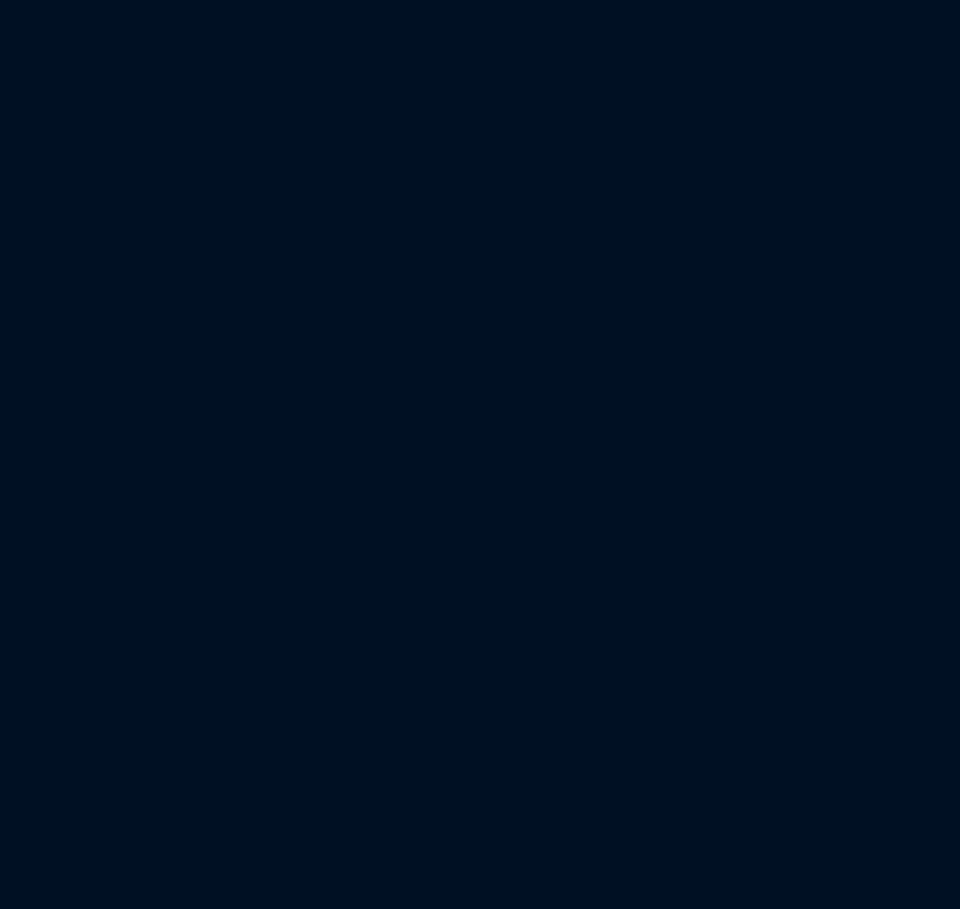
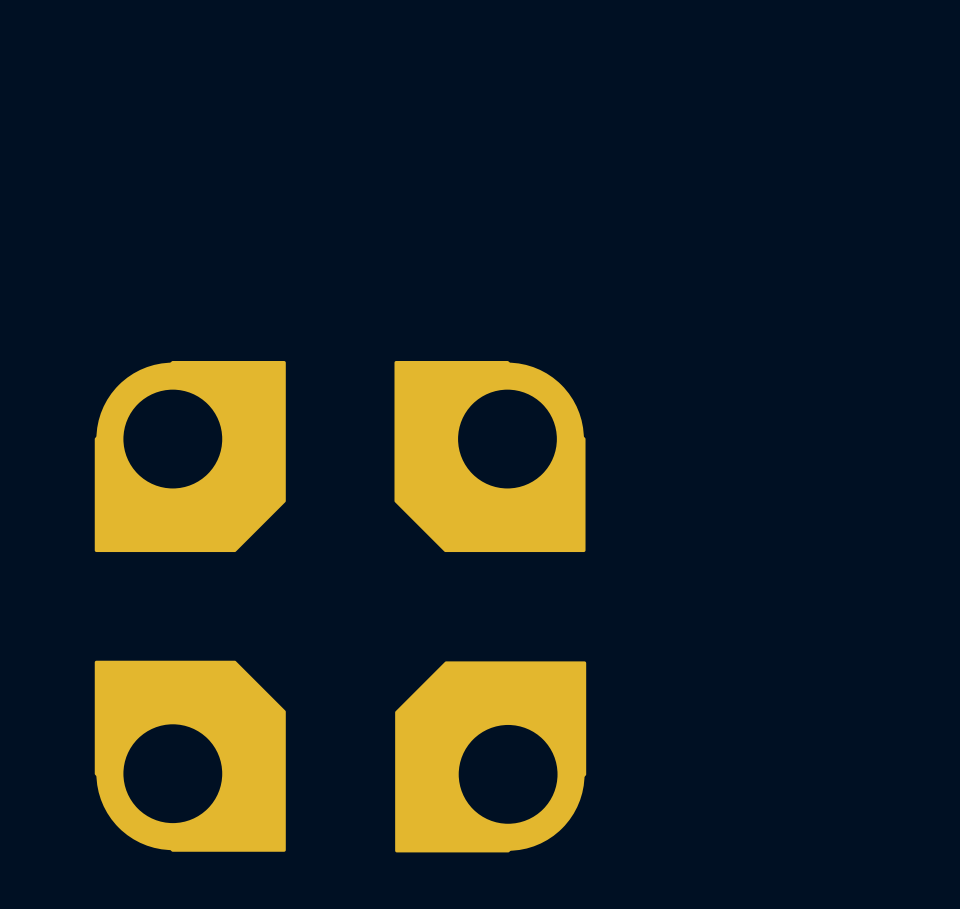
part: none -> (340, 606)

